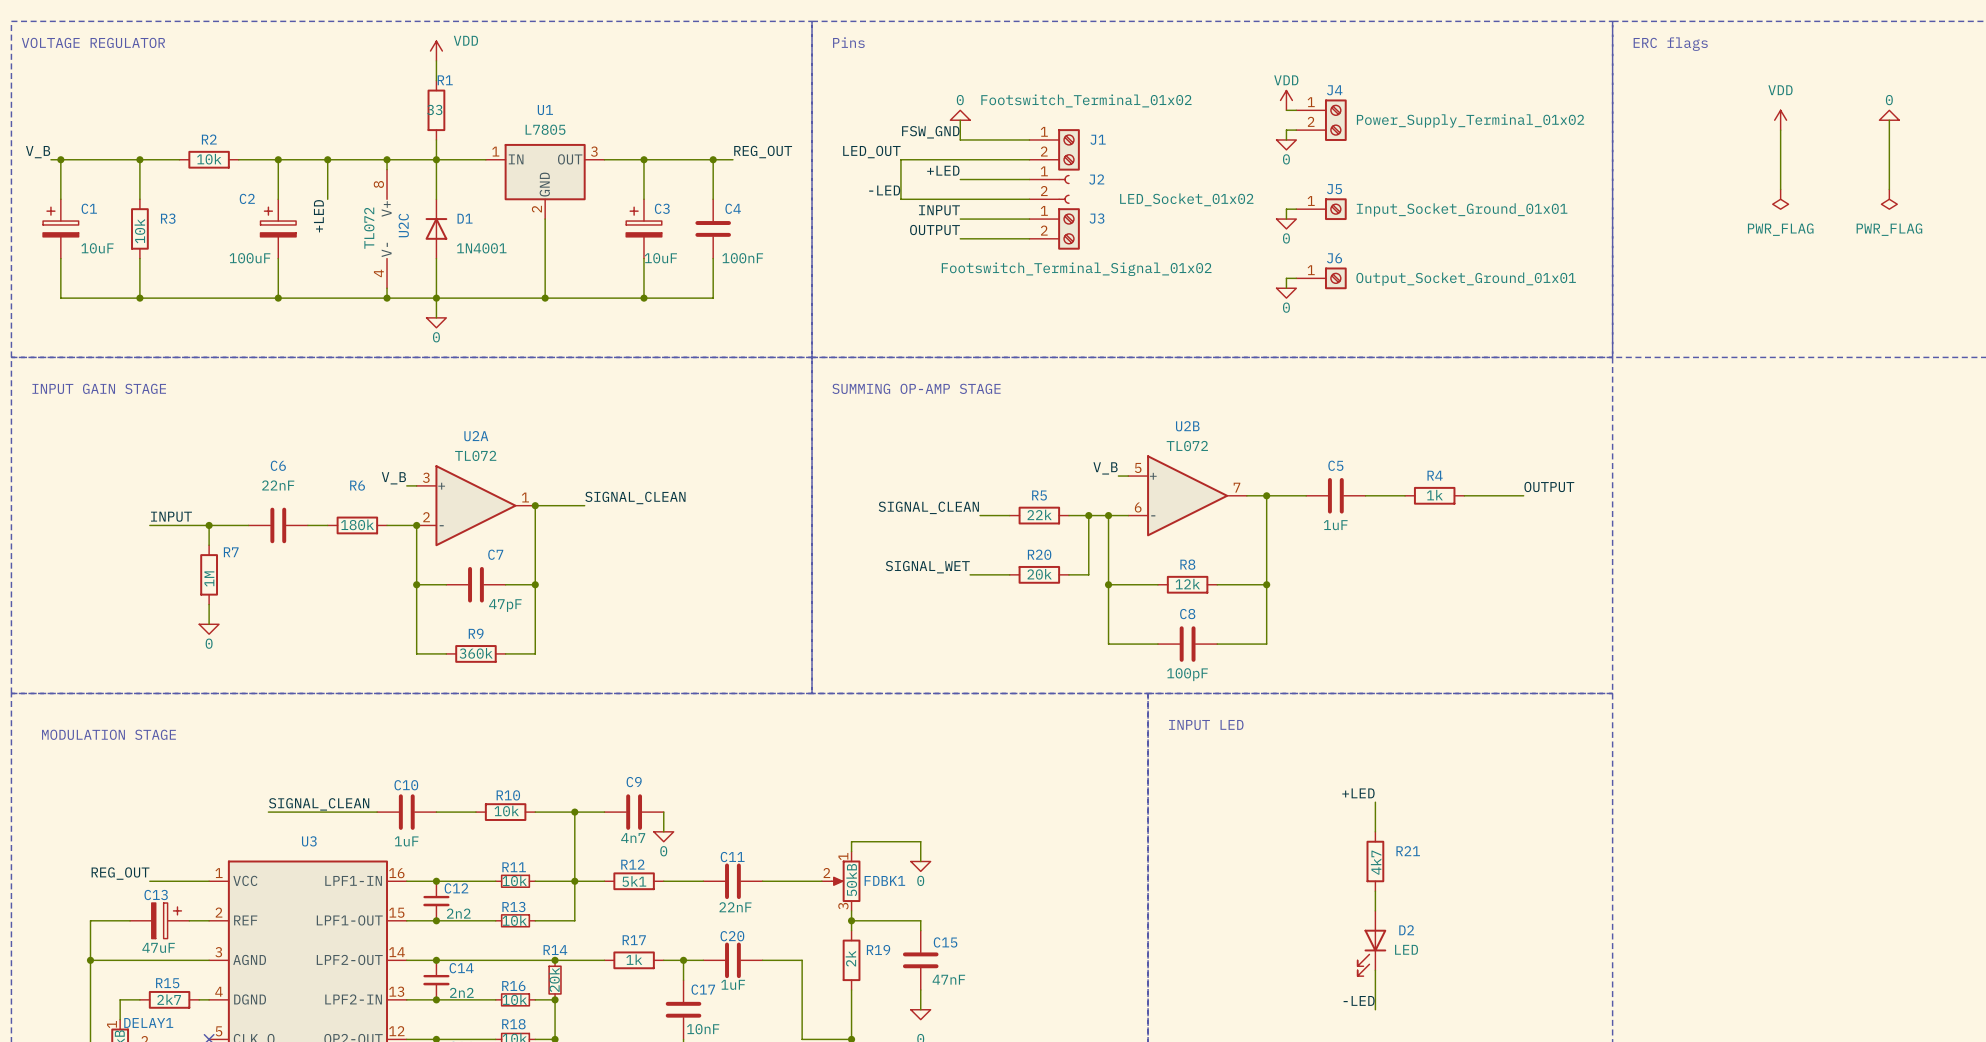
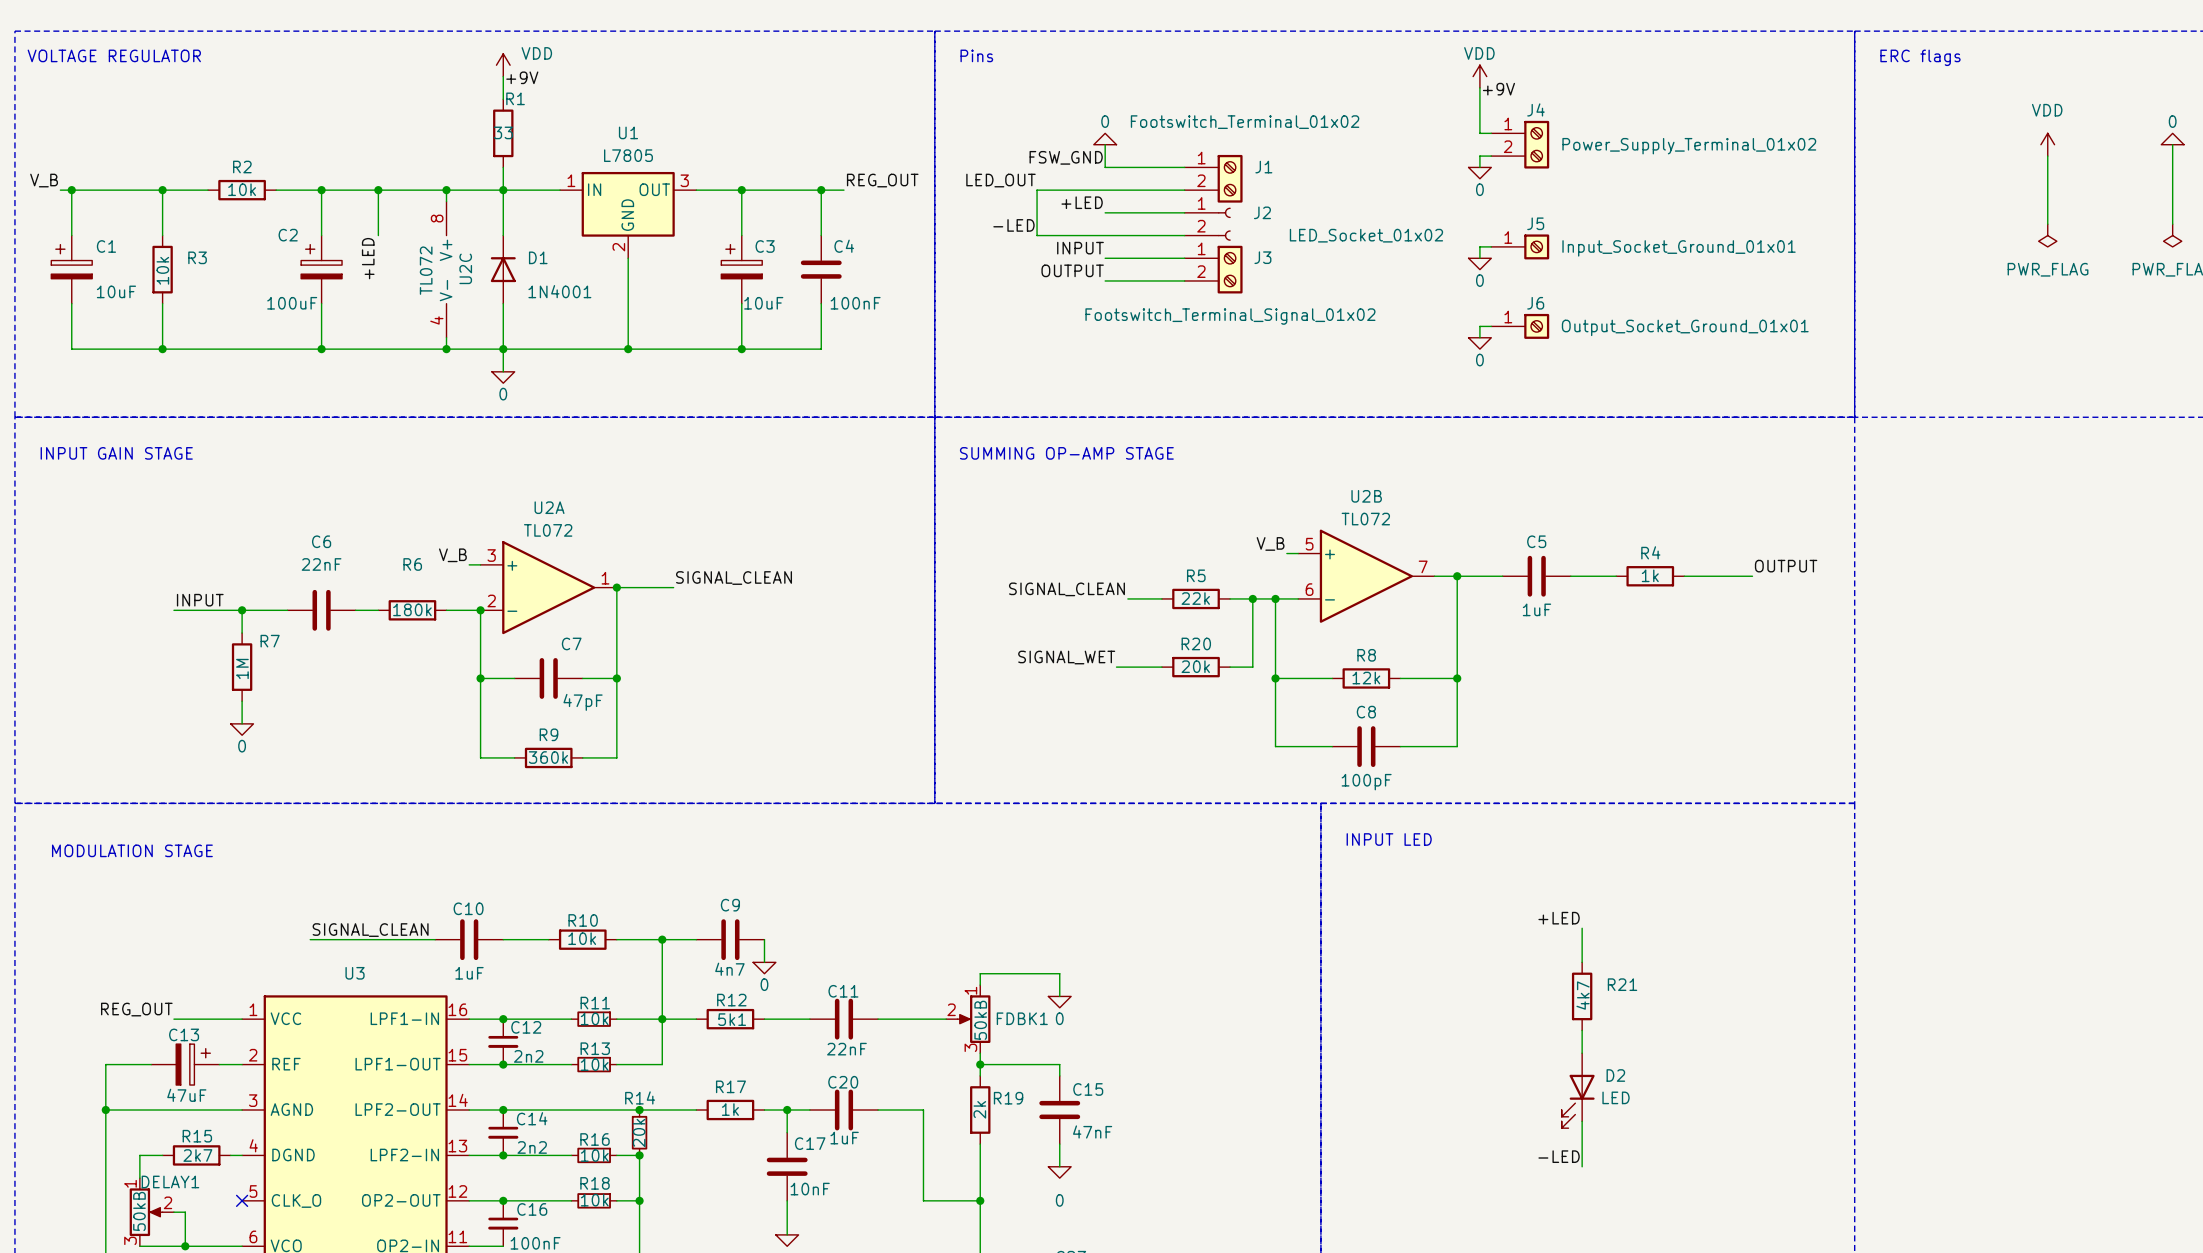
label: none -> +9V (522, 77)
label: none -> +9V (1498, 89)
power symbol position: VDD (1286, 100) -> VDD (1479, 76)

